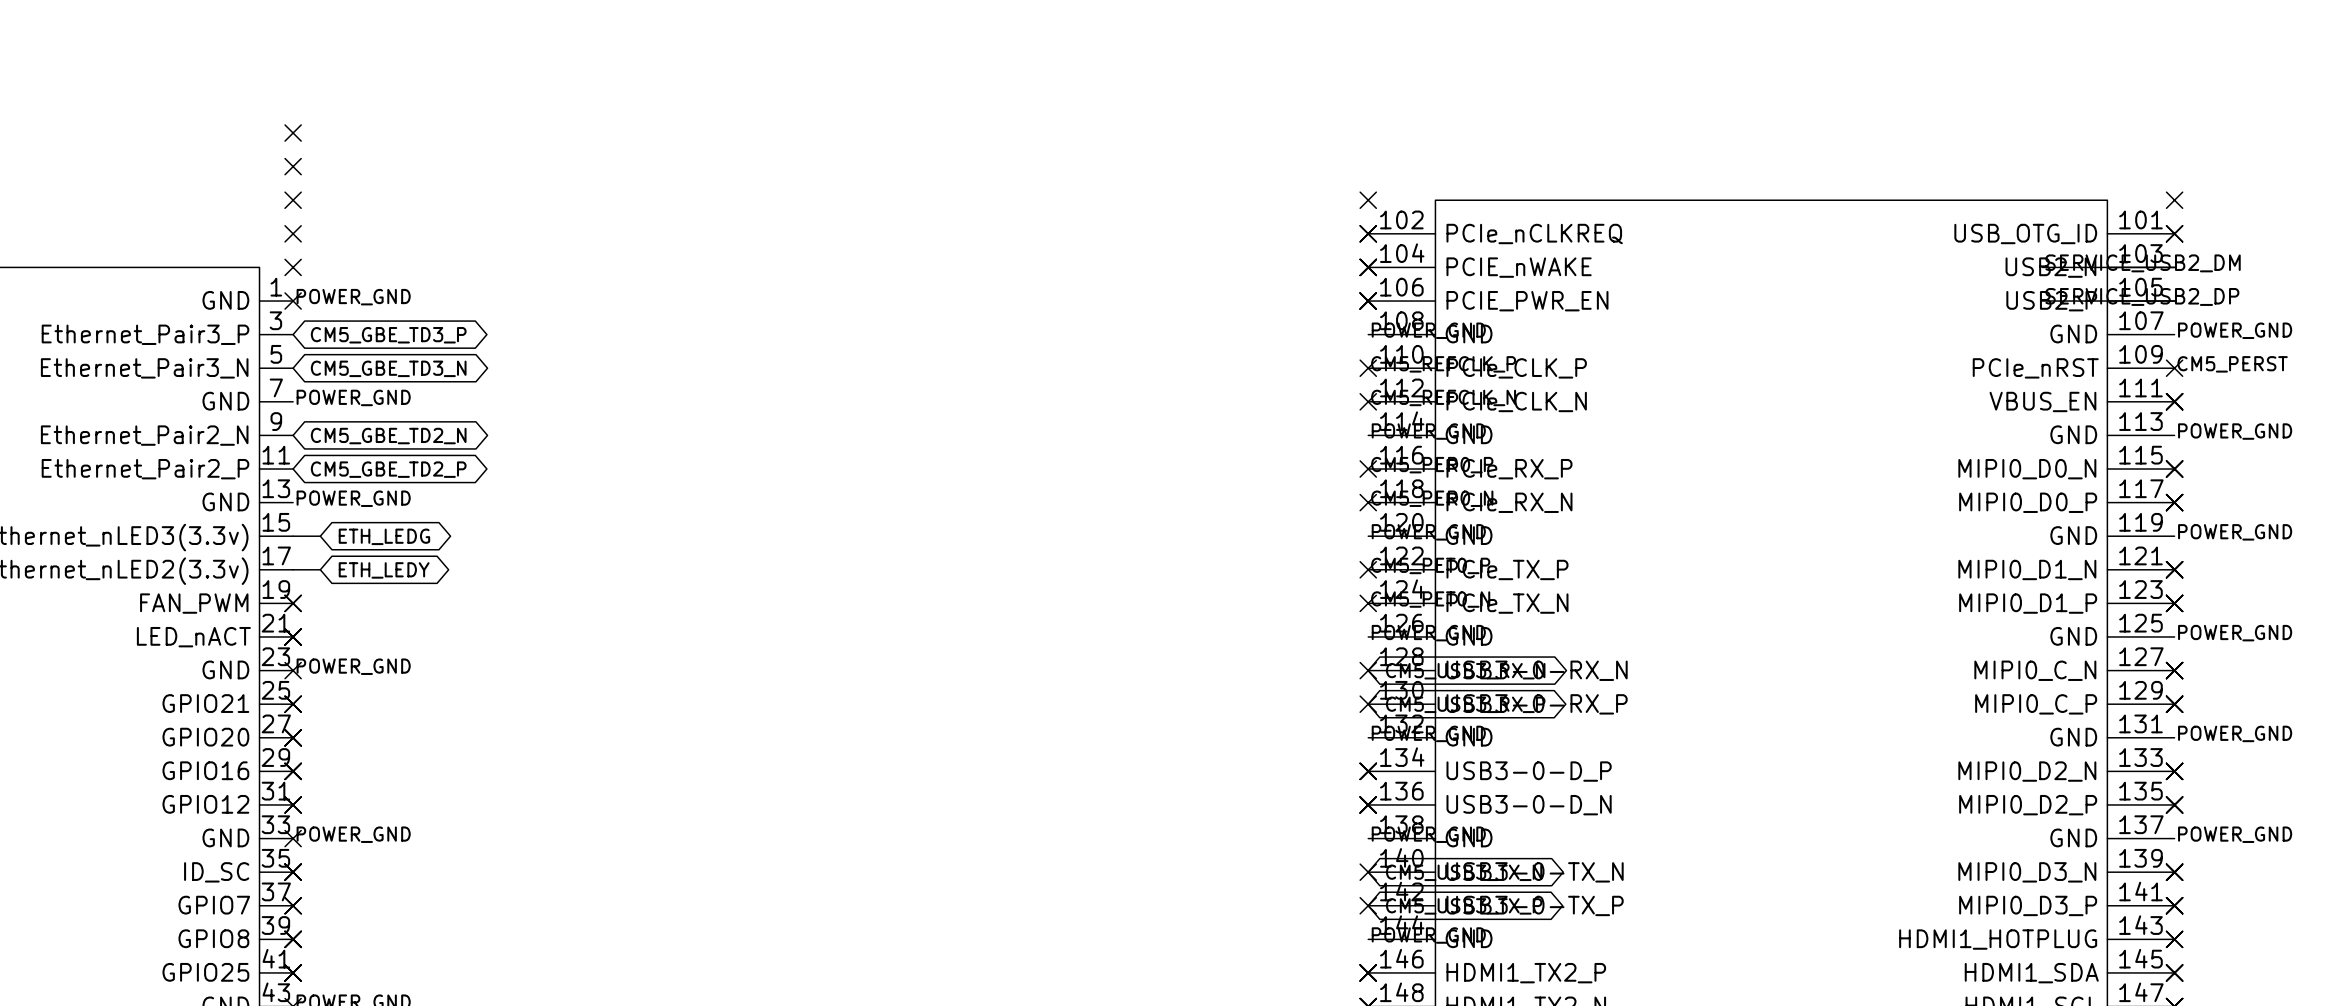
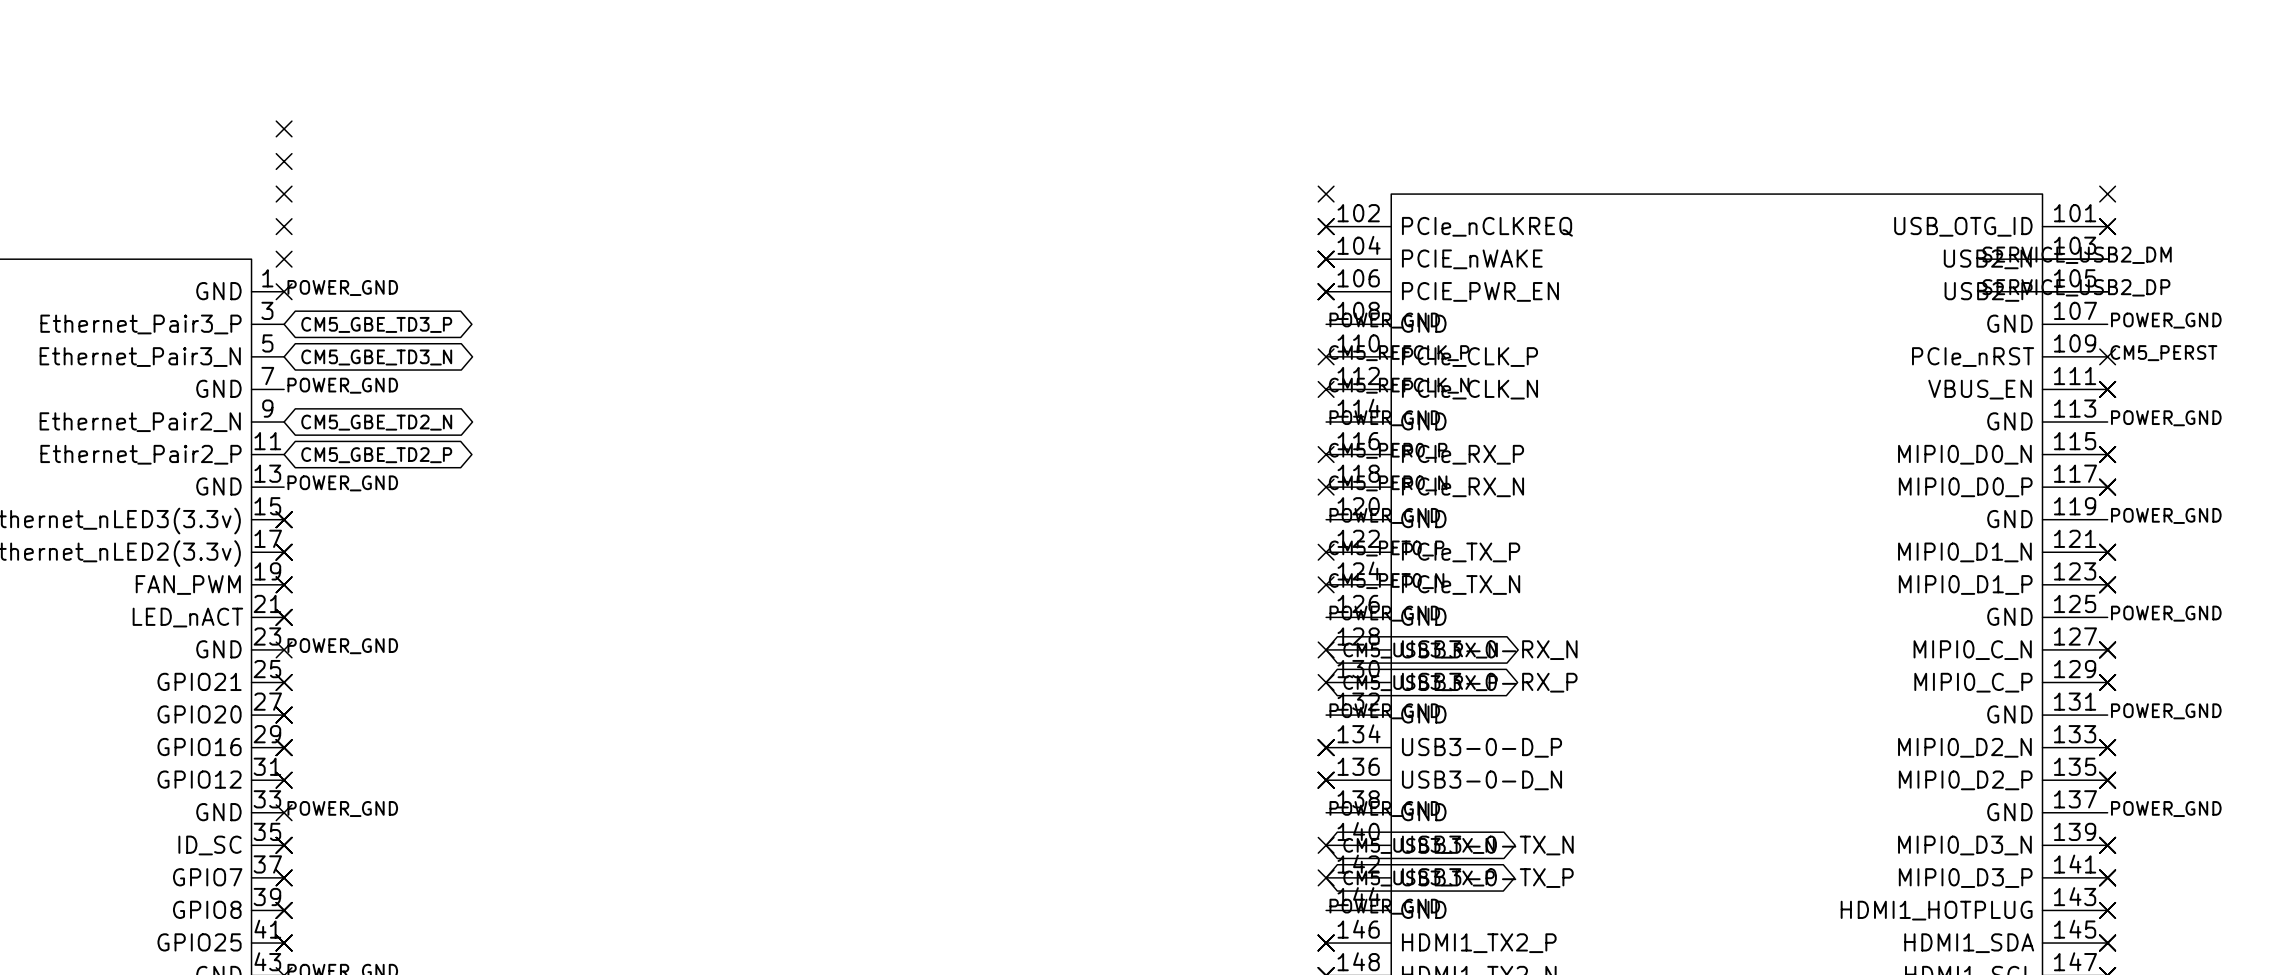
wire: (293, 536) (320, 536) -> none
no-connect mark: none -> (284, 519)
global label: ETH_LEDG (384, 536) -> none
wire: (293, 569) (320, 569) -> none
no-connect mark: none -> (284, 552)
global label: ETH_LEDY (384, 570) -> none

